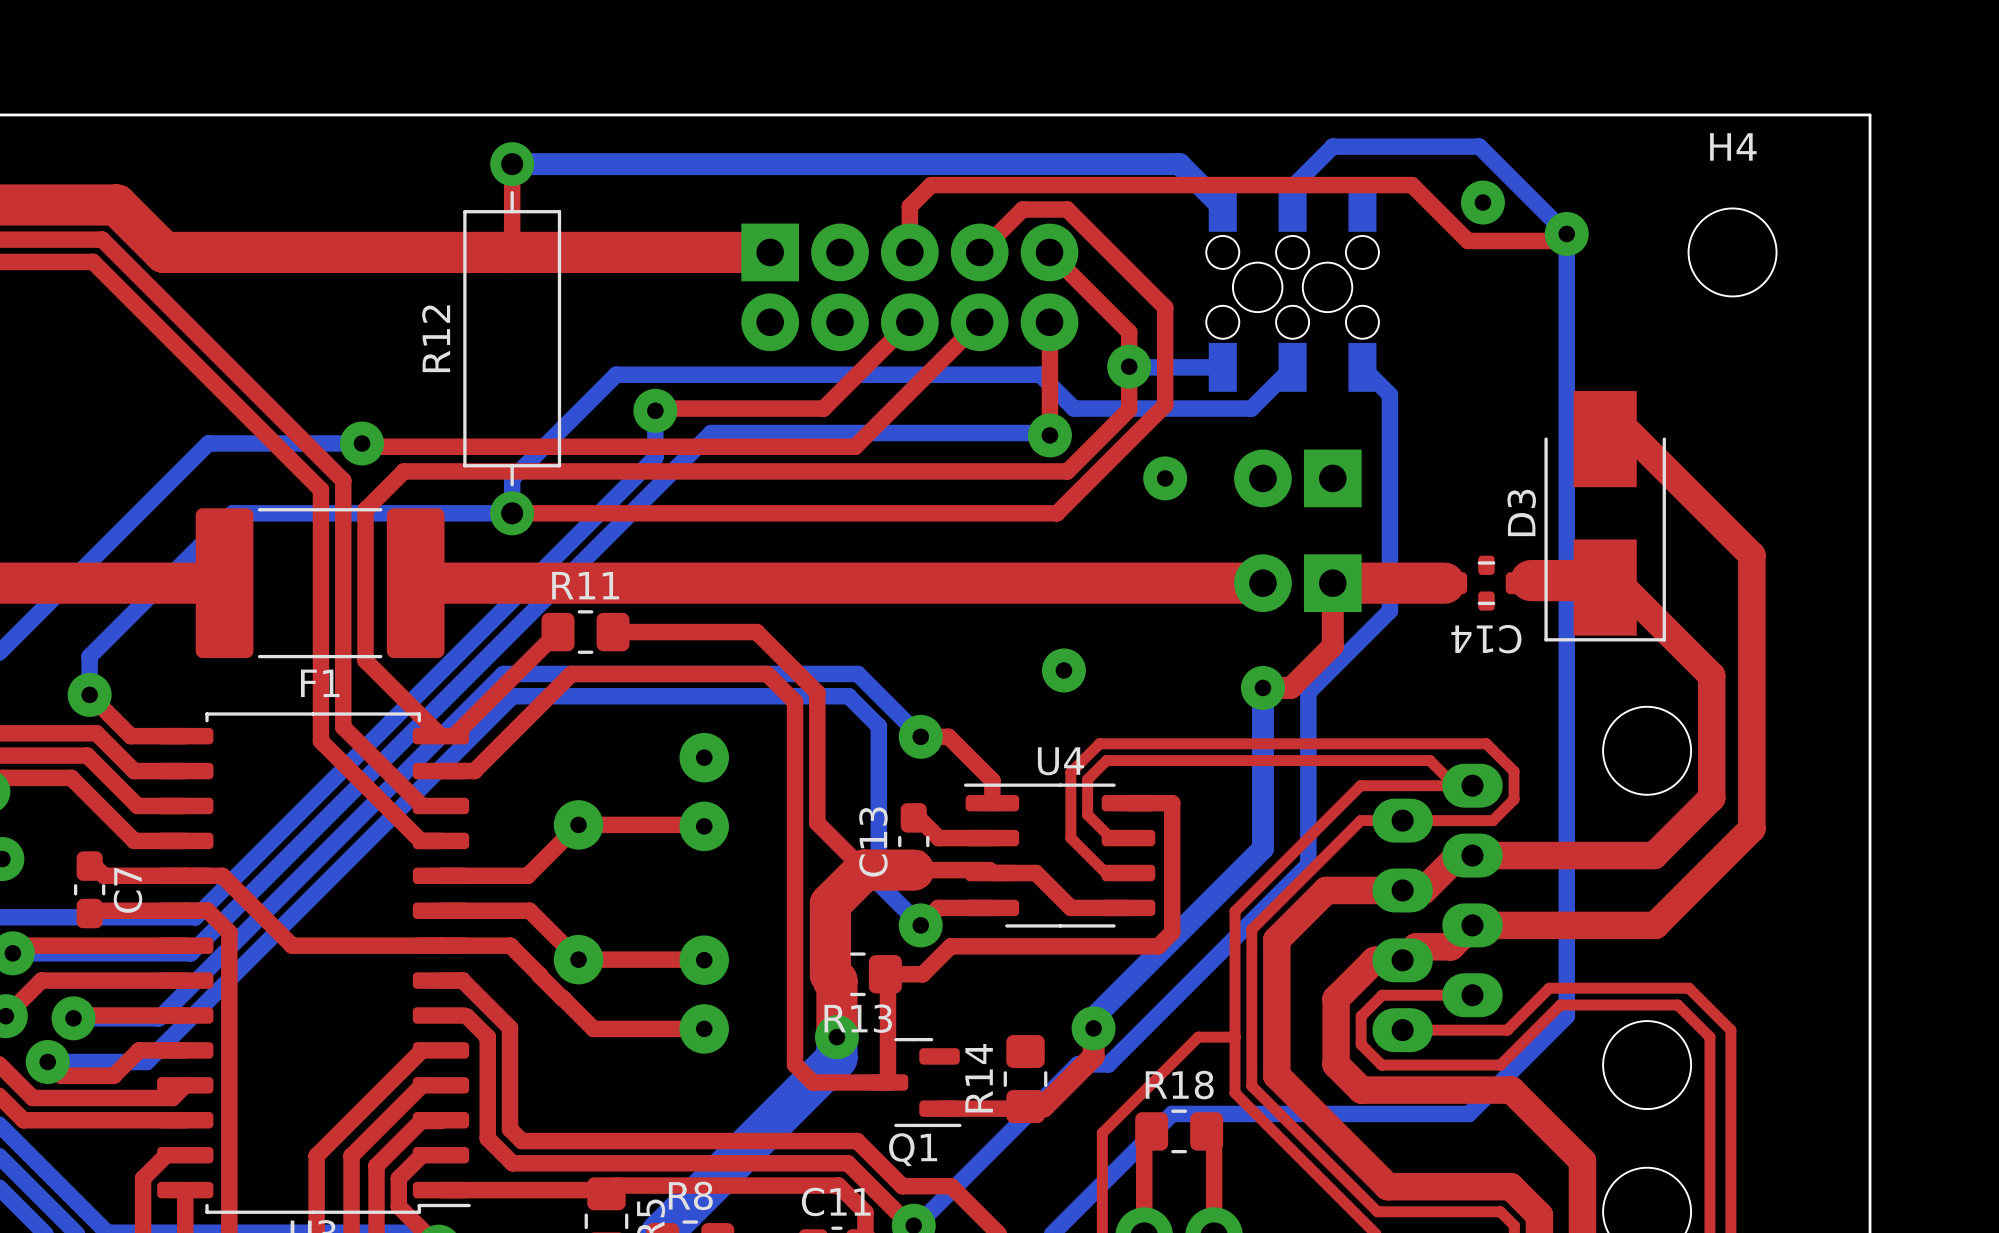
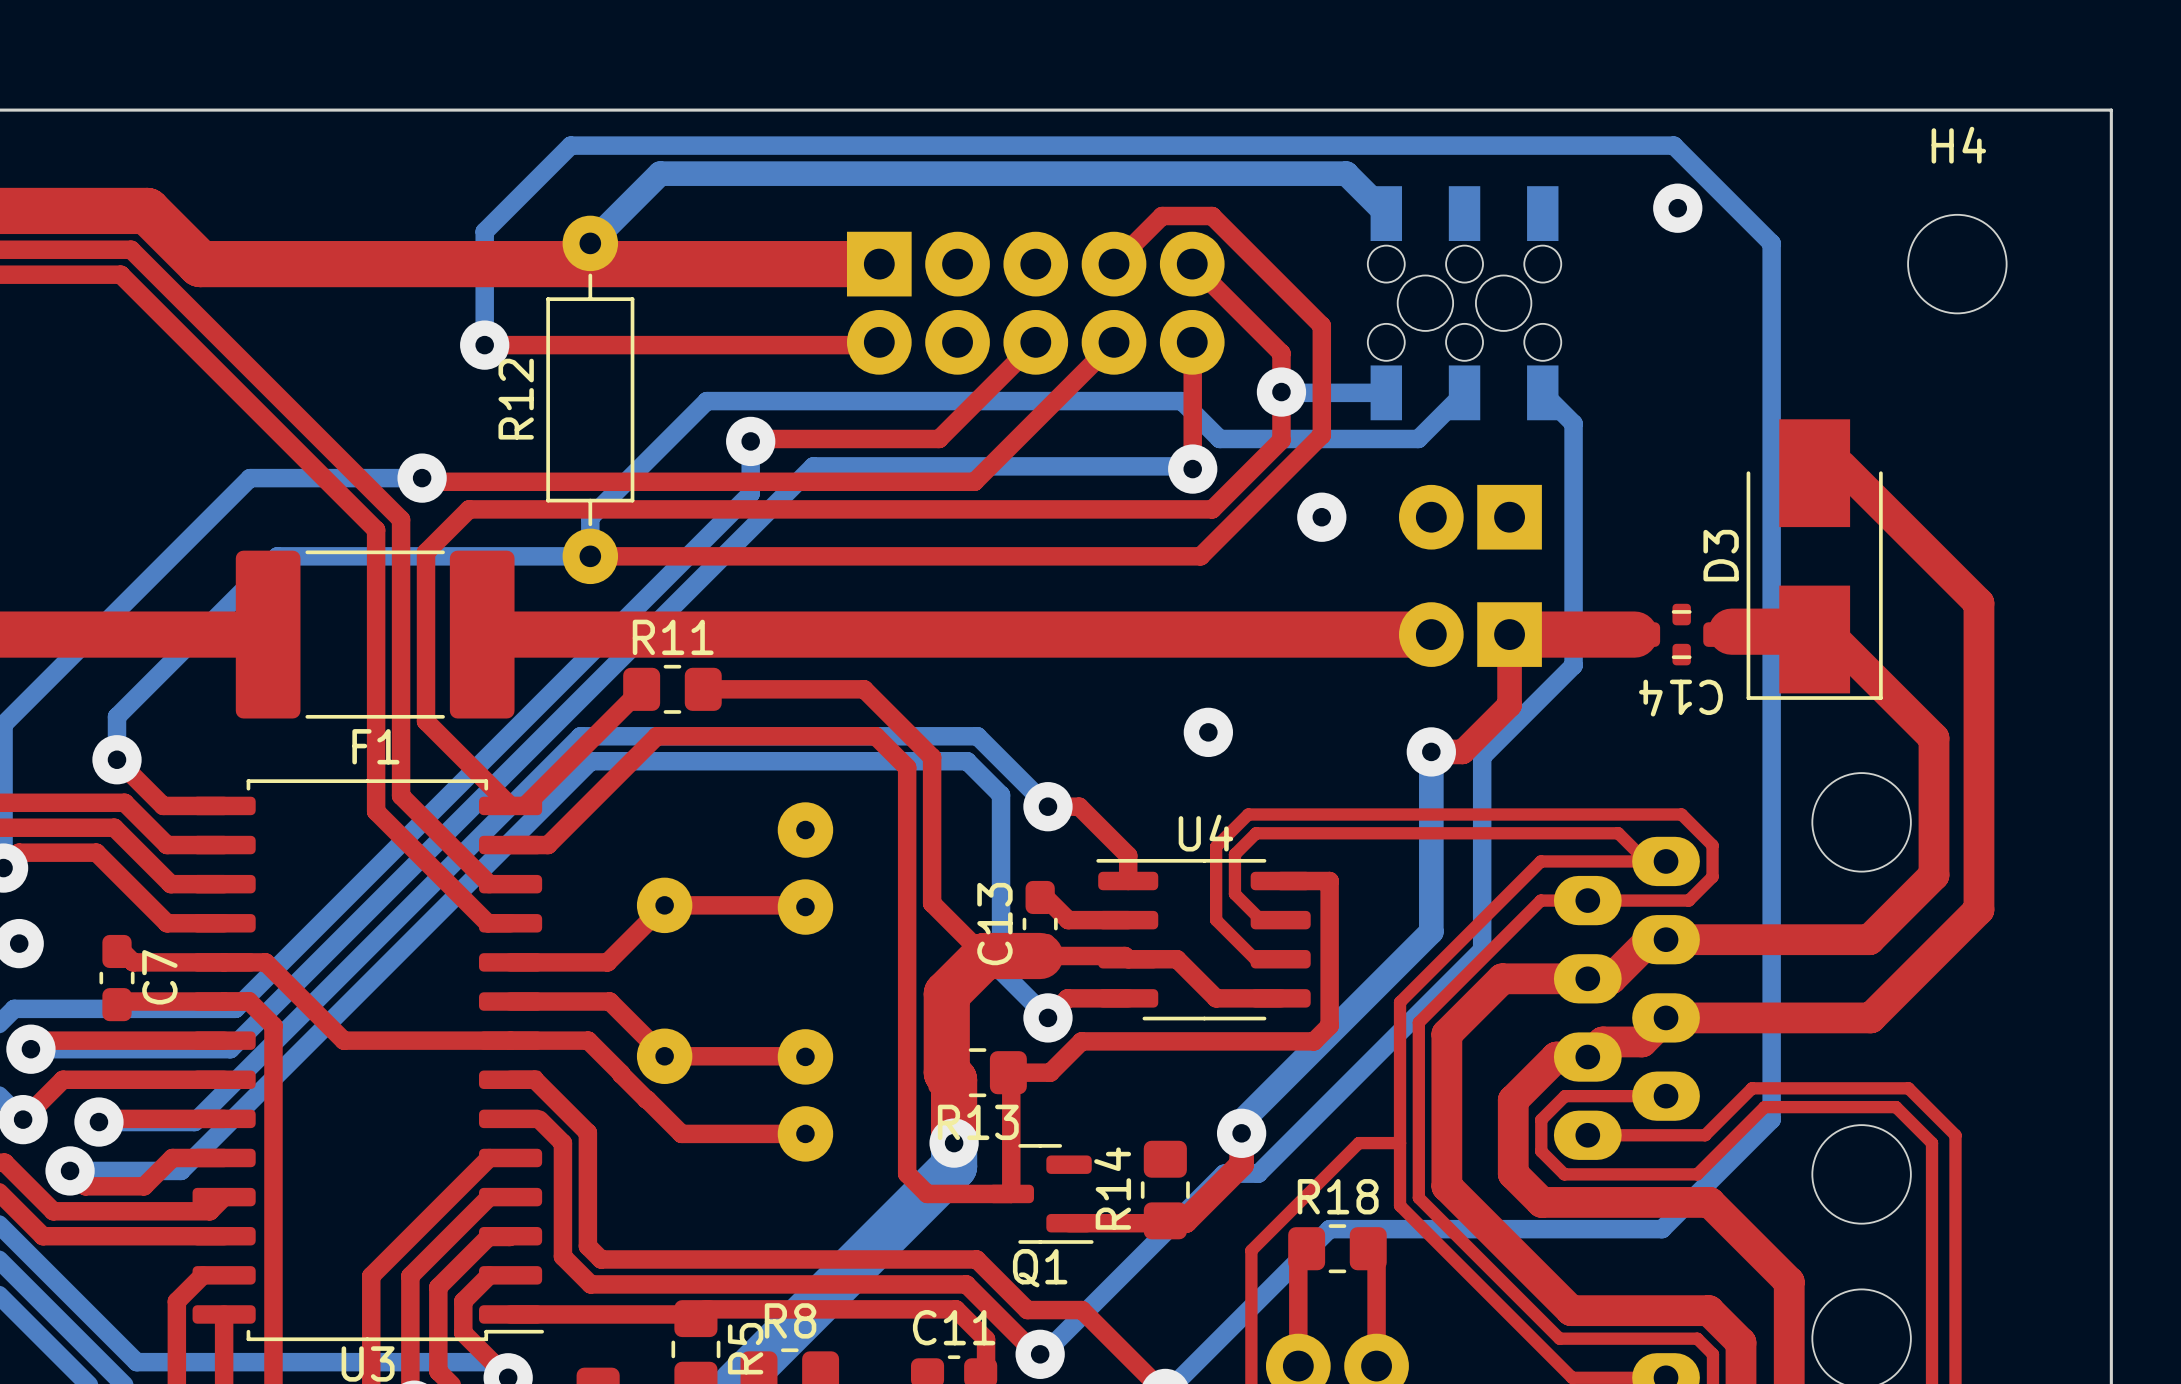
R12 footprint: [463, 142, 562, 536] -> [546, 215, 635, 585]
bottom track: (1332, 146) (1292, 186) (1292, 207) -> (1509, 145) (570, 145) (484, 231) (484, 345)
top track: (512, 164) (512, 249) -> none
bottom track: (512, 164) (1179, 164) (1187, 171) -> (590, 243) (660, 173) (1346, 173)
top track: (1566, 233) (1559, 240) (1467, 240) (1412, 185) (931, 185) (909, 206) (909, 252) -> none
via: (1566, 233) -> none
top track: none -> (484, 345) (876, 345)
via: none -> (484, 345)

